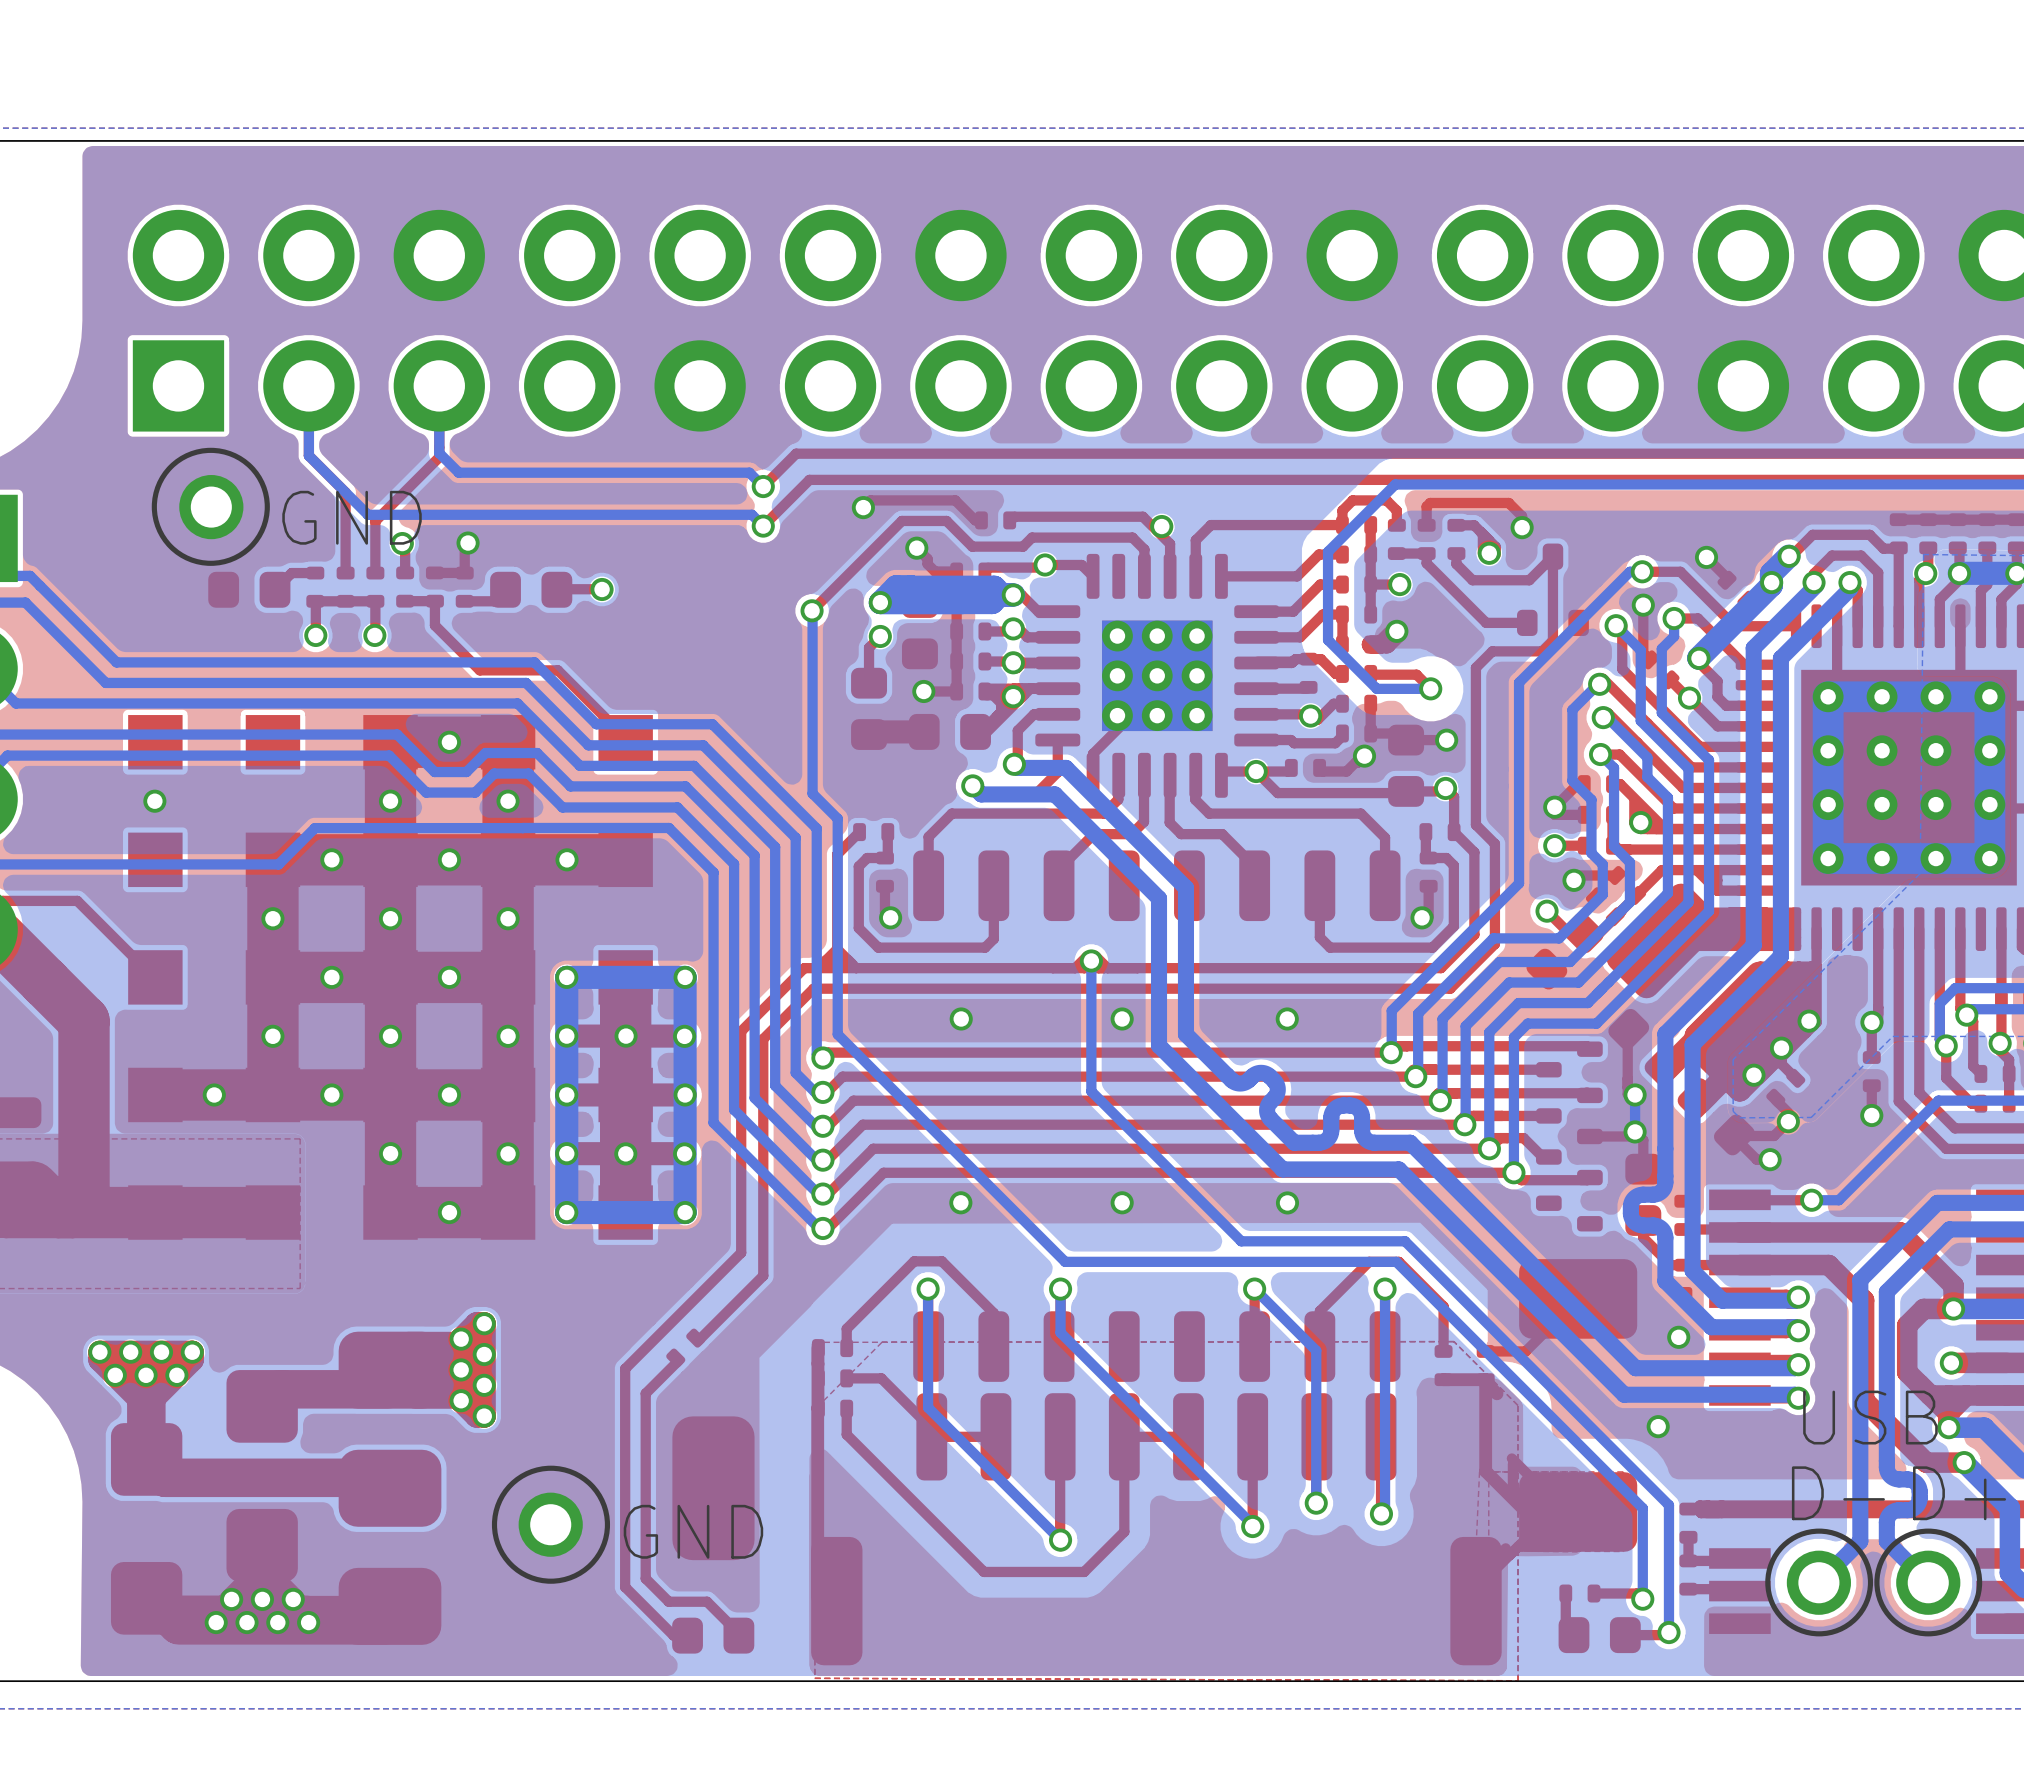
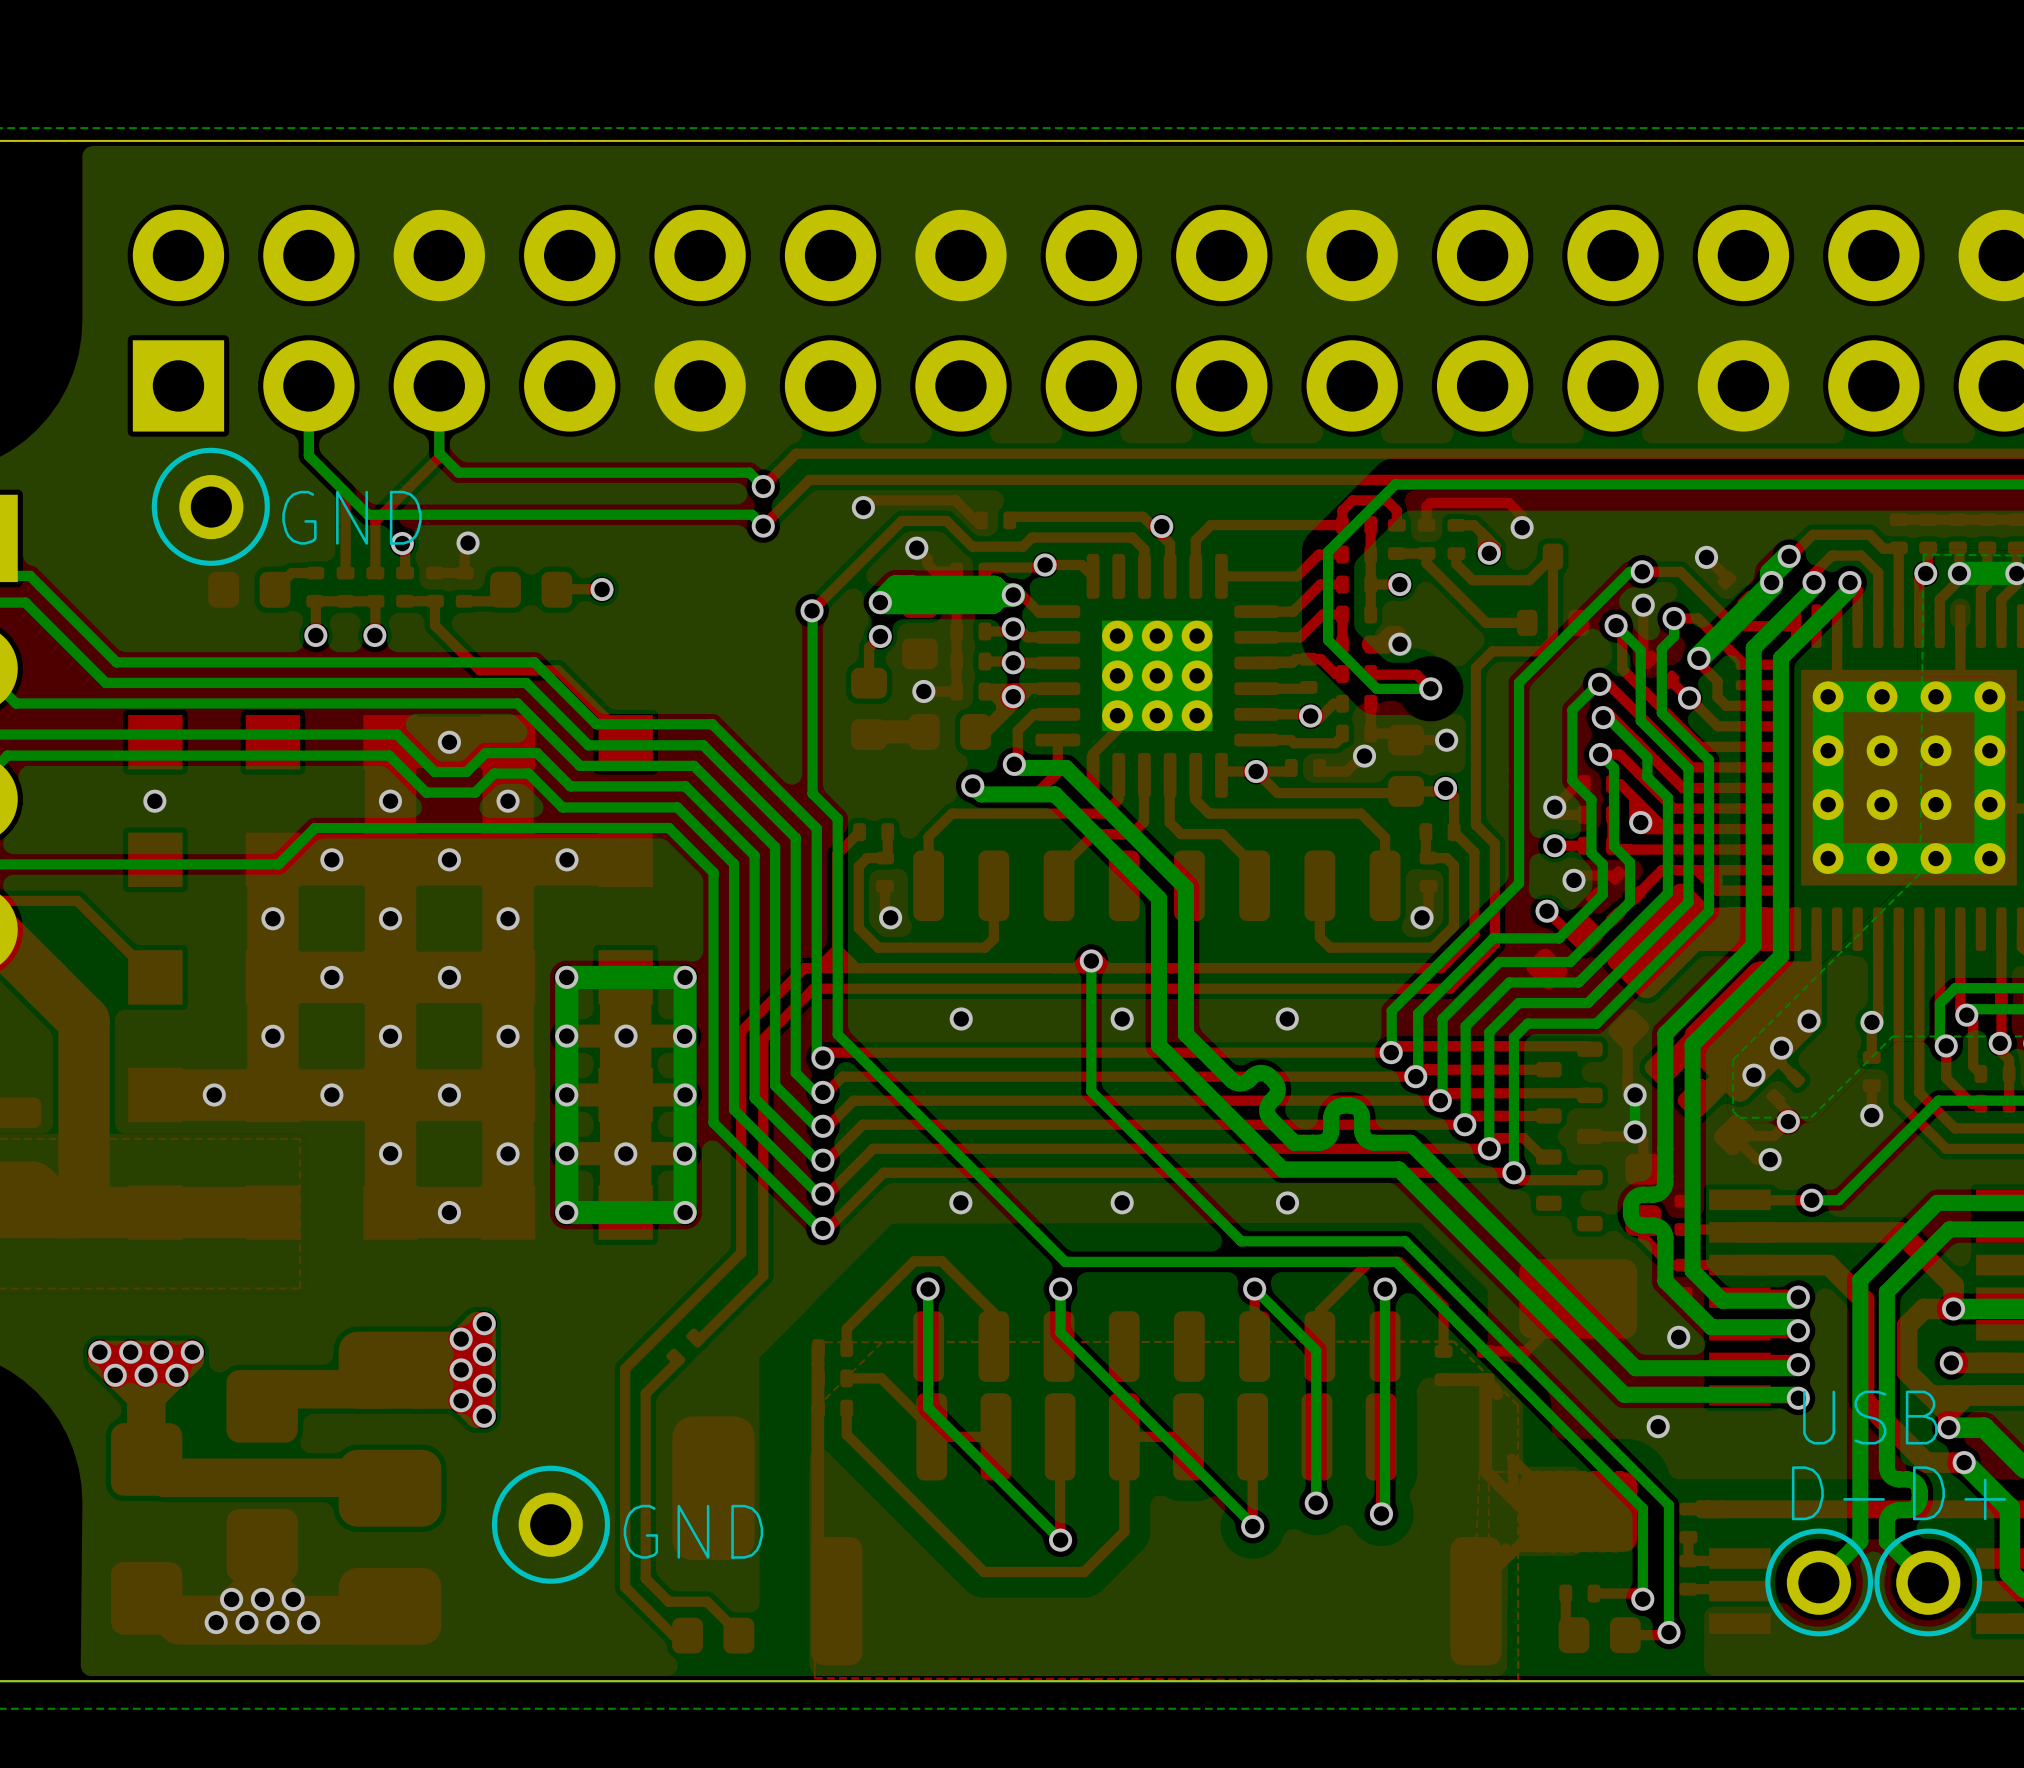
via position: (1396, 631) -> (1399, 644)

